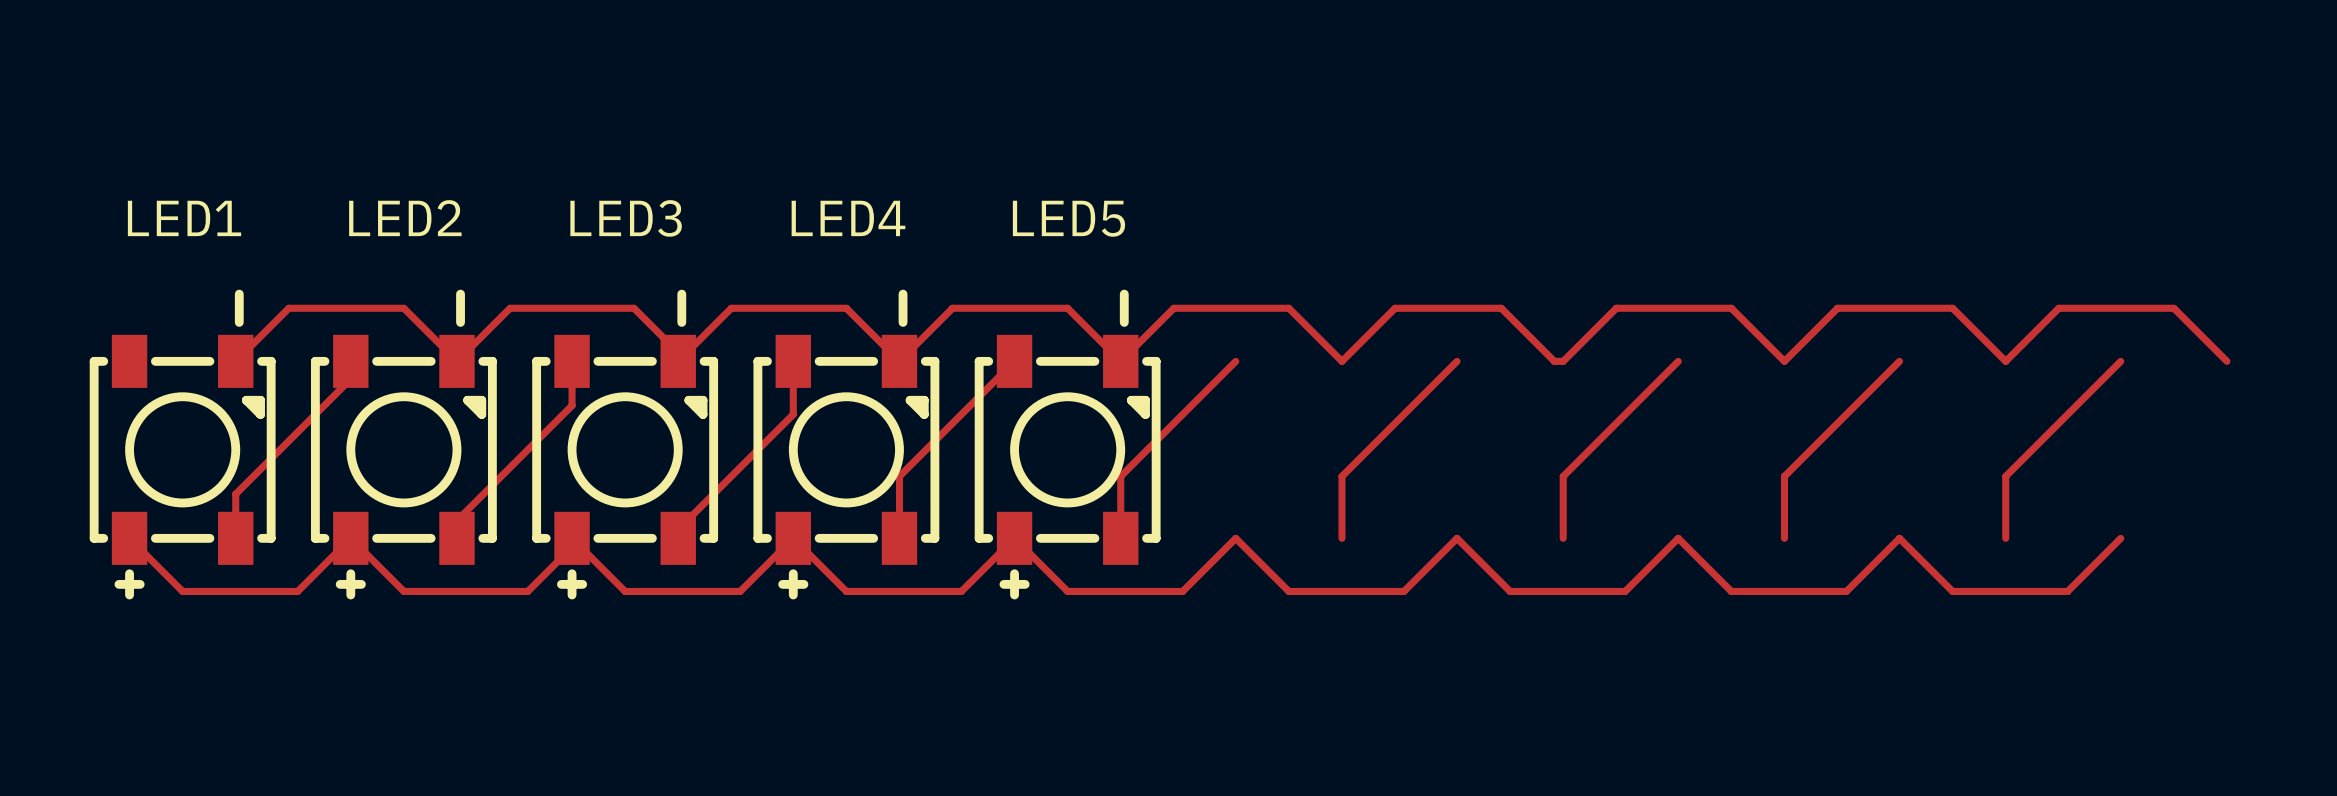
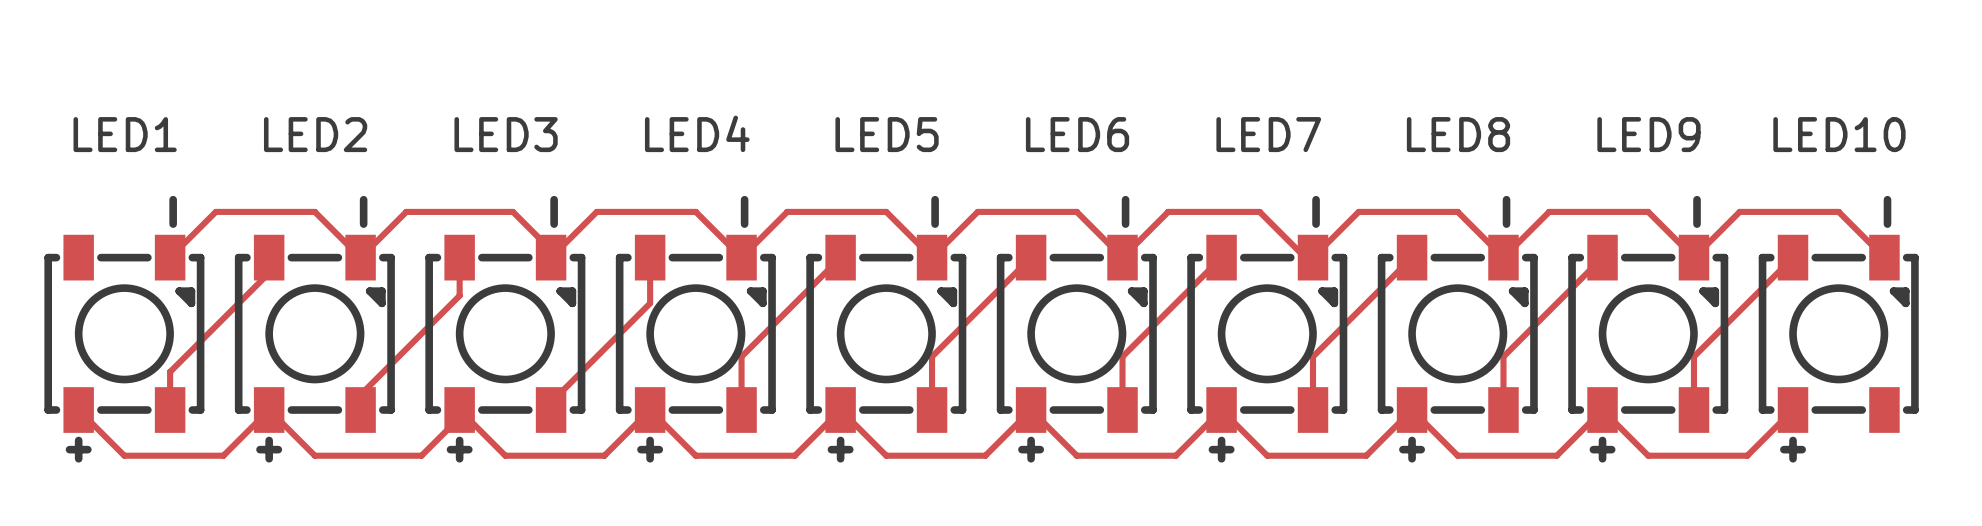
LED6: none -> (1076, 329)
LED7: none -> (1267, 329)
LED8: none -> (1457, 329)
LED9: none -> (1648, 329)
LED10: none -> (1838, 329)

